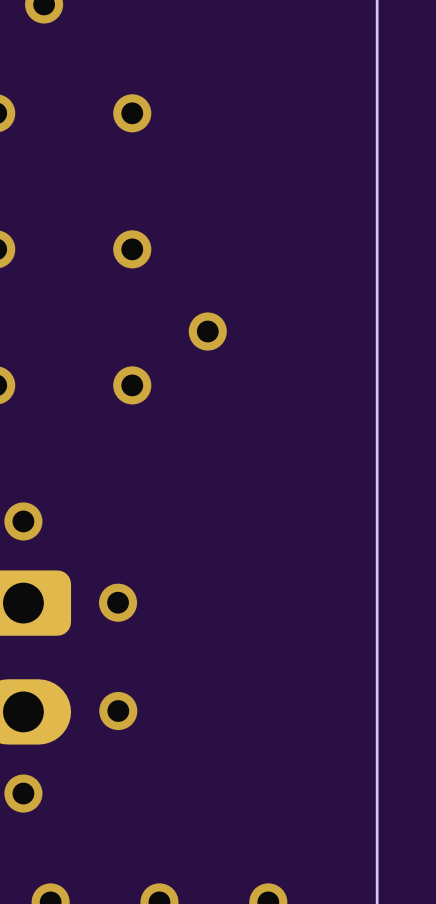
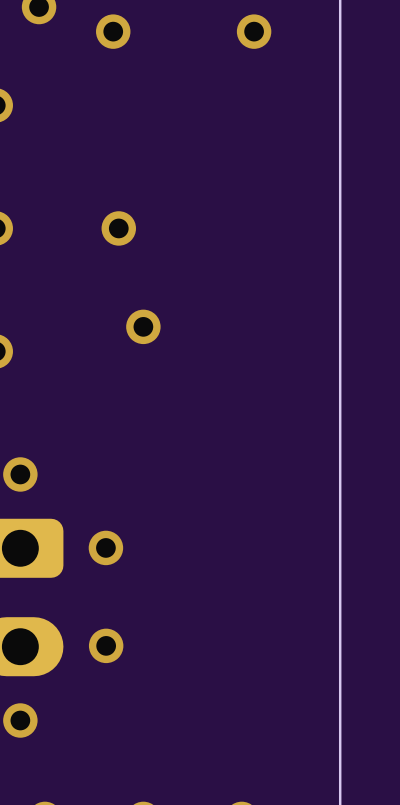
via: none -> (254, 31)
via position: (132, 113) -> (113, 31)
via: (207, 331) -> none
via position: (132, 385) -> (143, 326)

